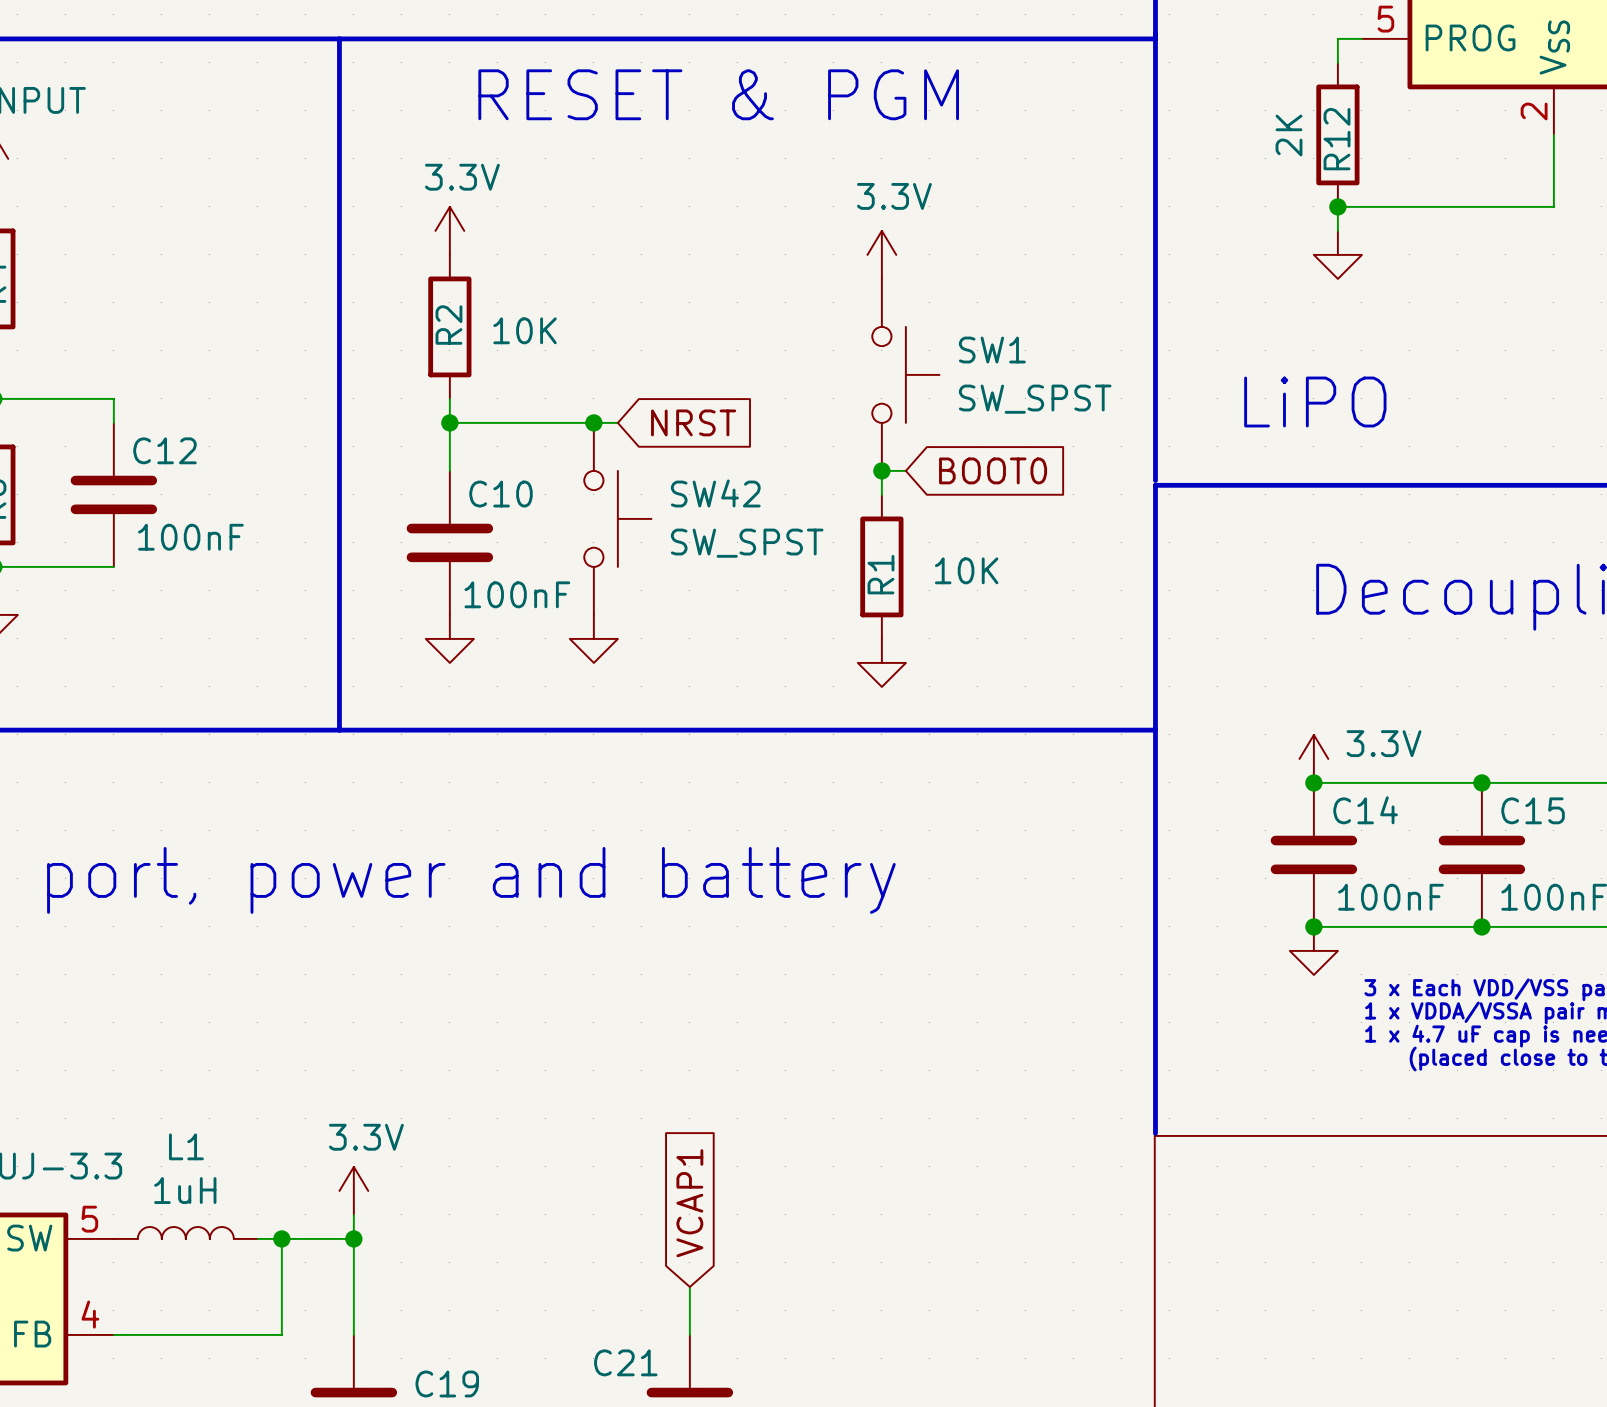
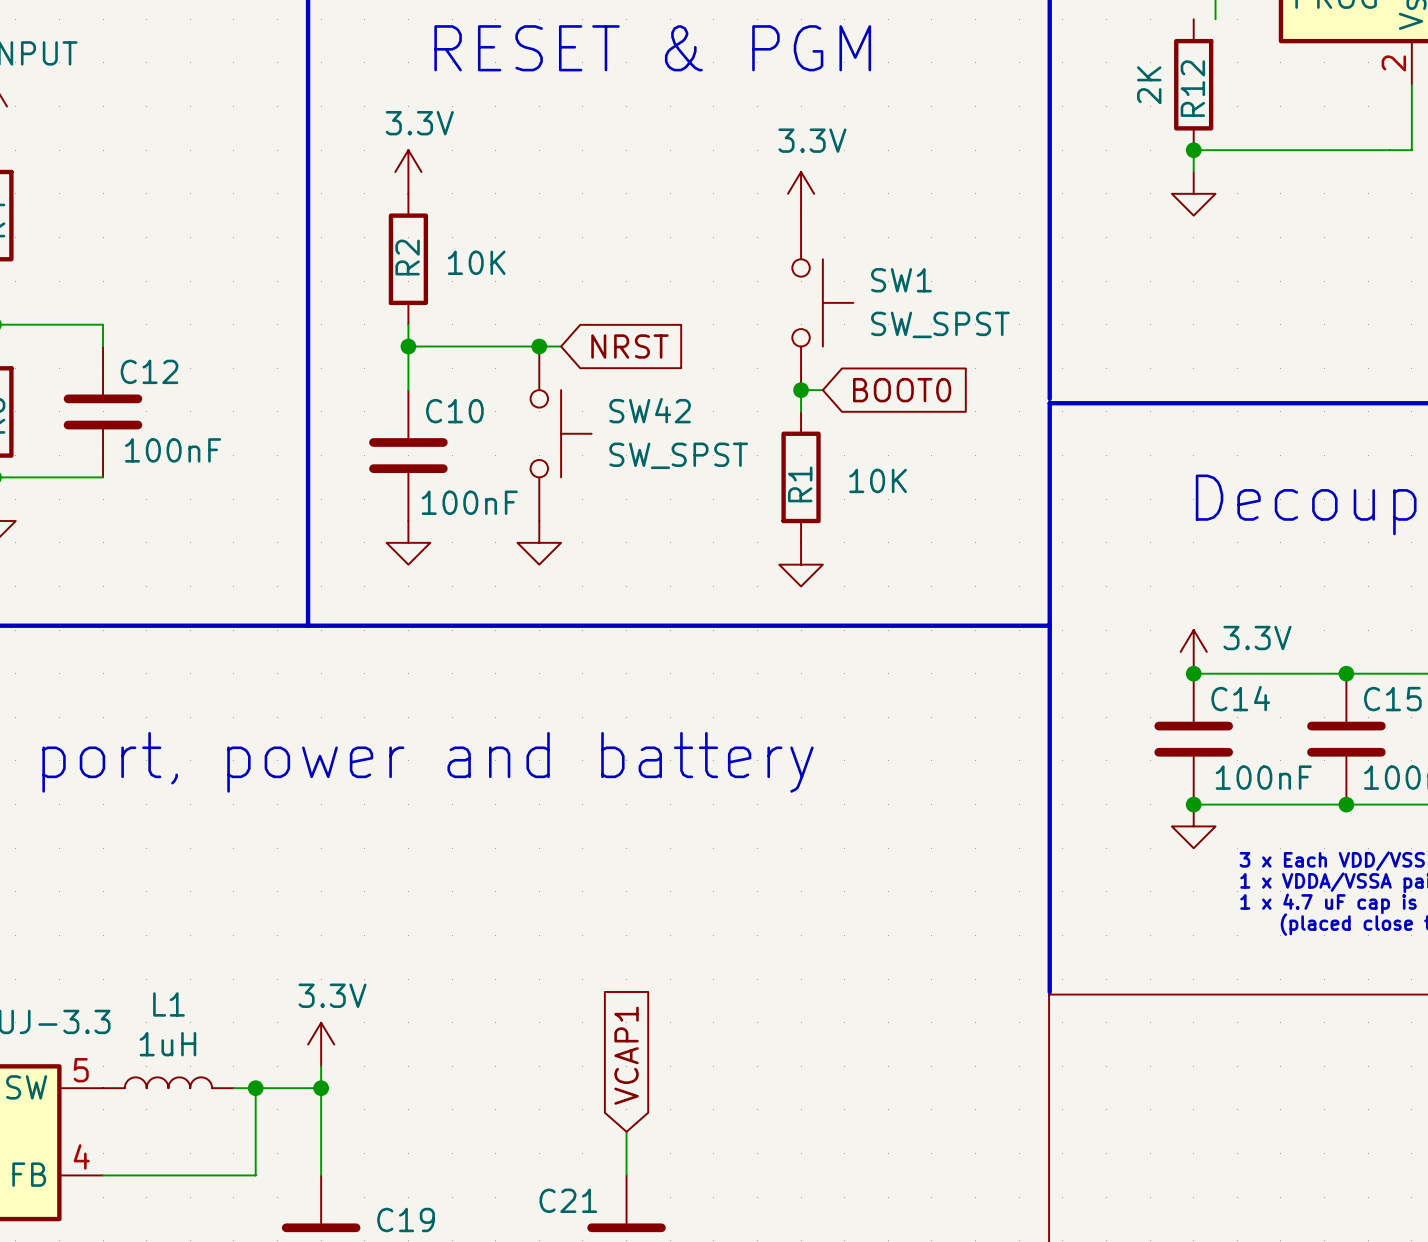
R12 position: (1337, 134) -> (1193, 84)
wire: (1337, 206) (1337, 230) -> (1215, 150) (1193, 150) (1193, 172)
junction position: (1337, 206) -> (1193, 150)
power symbol position: (1337, 254) -> (1193, 193)
text: LiPO (1315, 402) -> none

